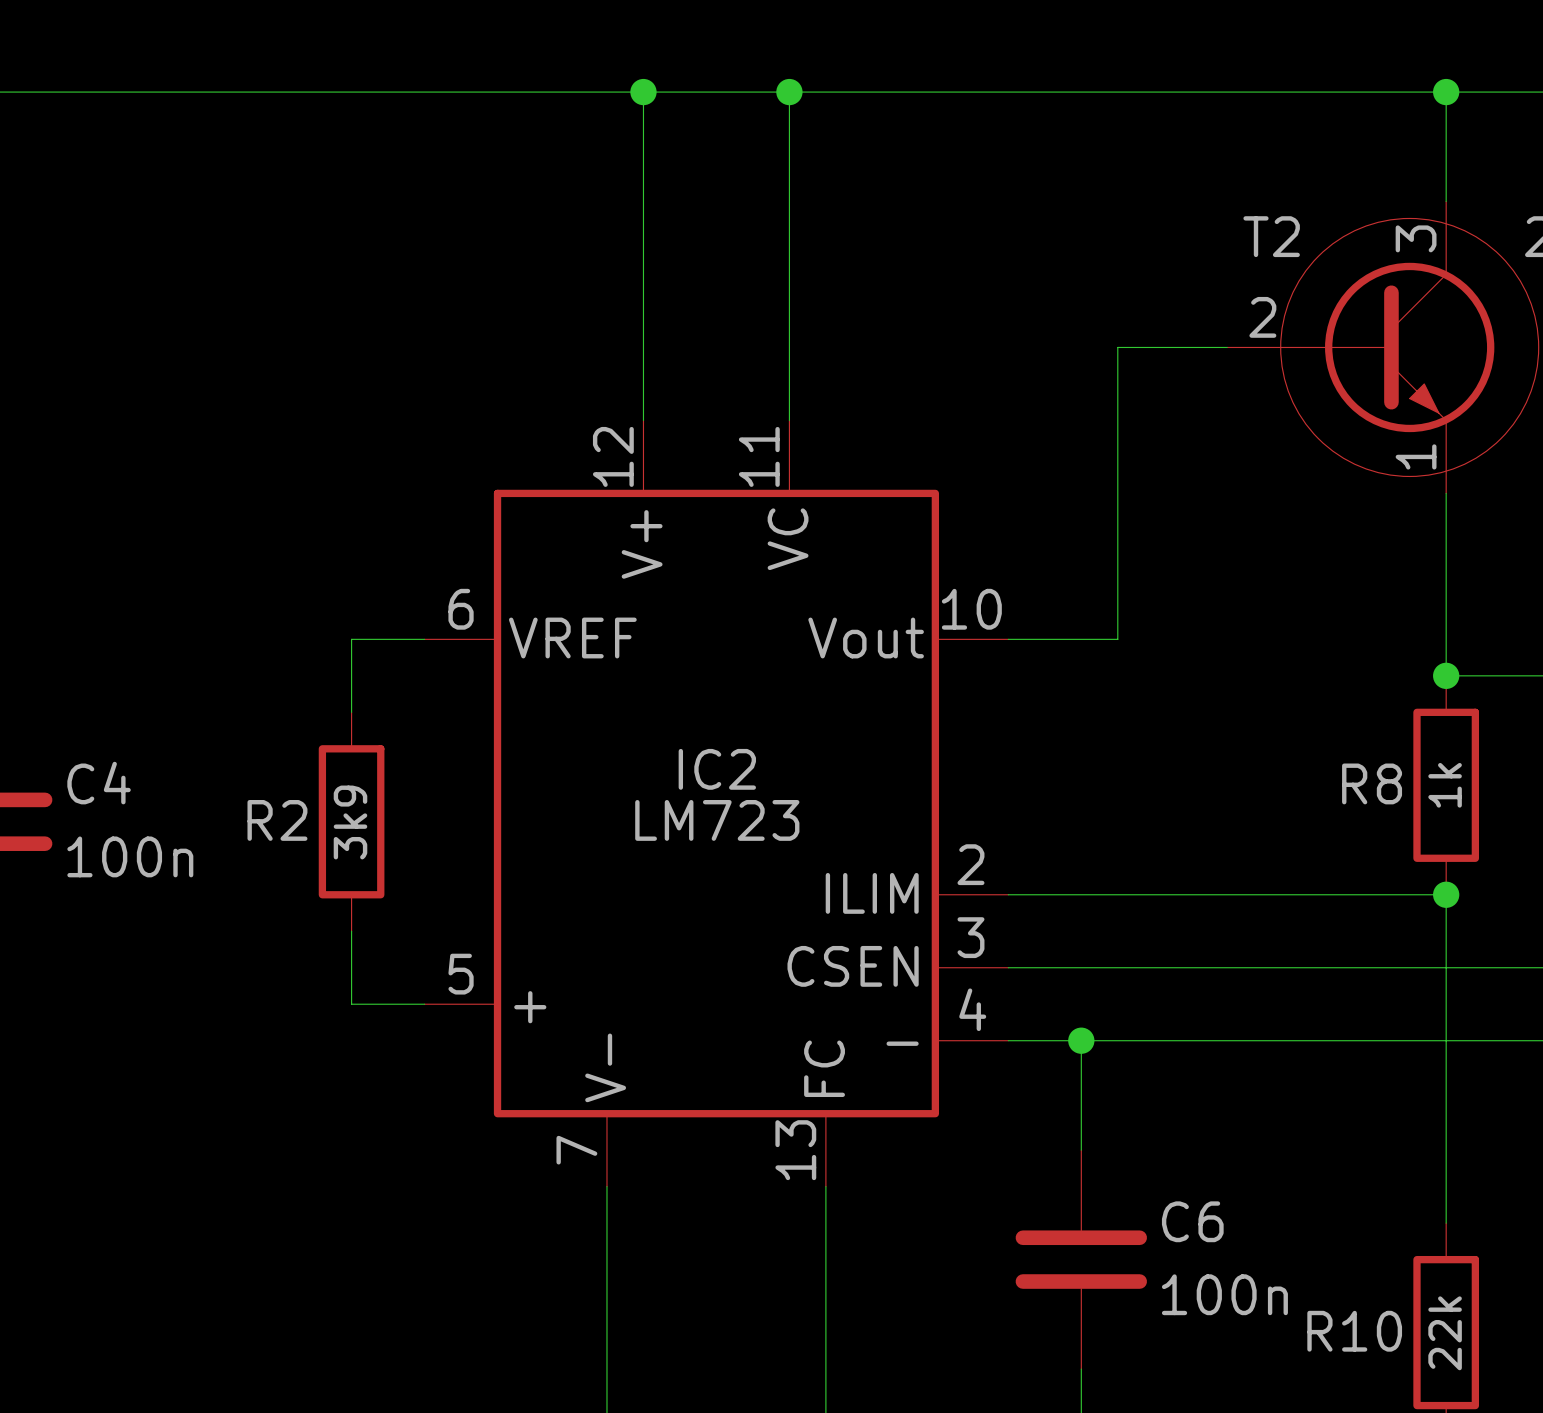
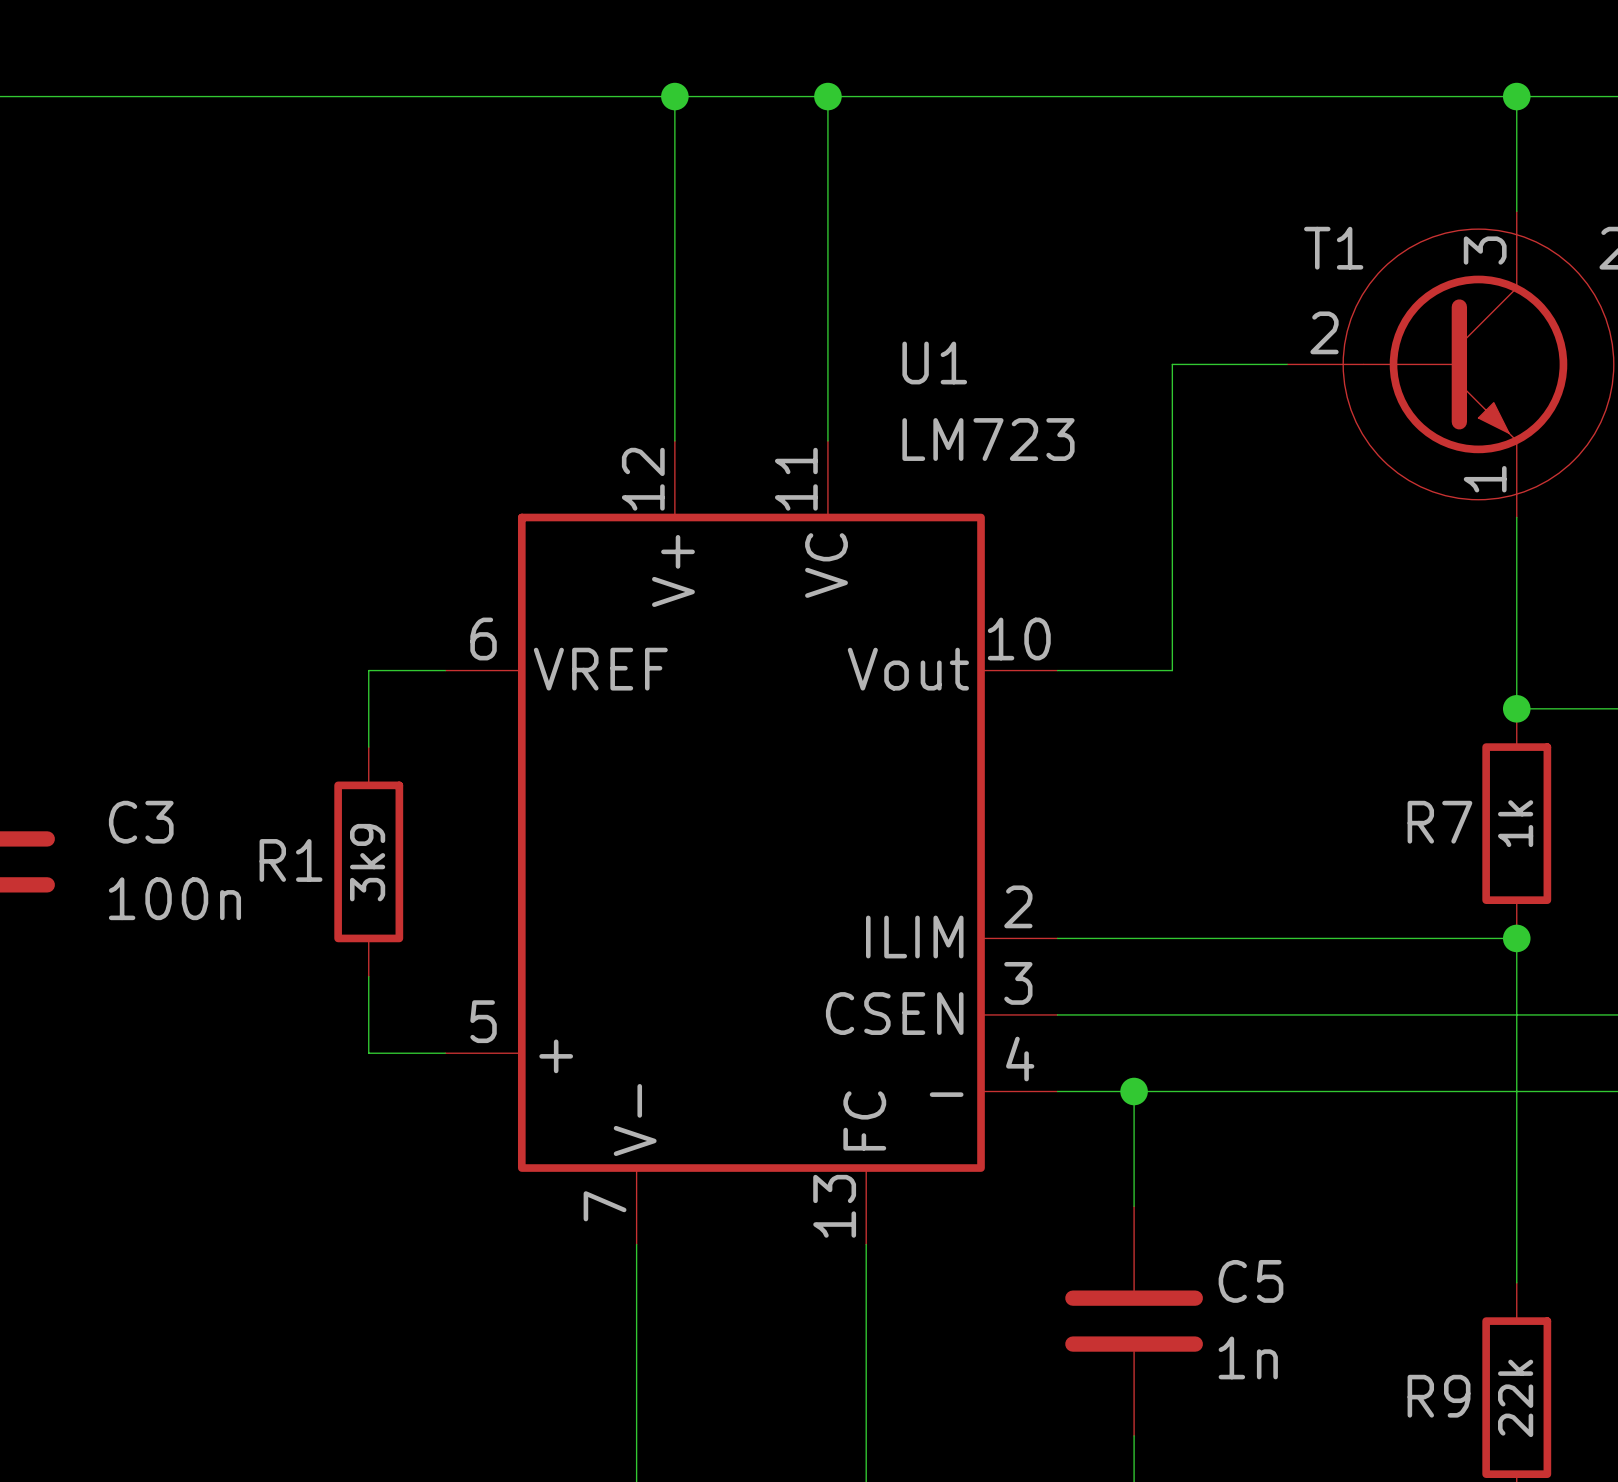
T2 name: T2 (1271, 236) -> T1 (1333, 248)
IC2 name: IC2 (717, 769) -> U1 (934, 362)
C4 name: C4 (99, 783) -> C3 (141, 822)
R8 name: R8 (1372, 783) -> R7 (1439, 822)
R2 name: R2 (277, 820) -> R1 (291, 860)
IC2 value position: LM723 (717, 820) -> LM723 (988, 439)
C4 value position: 100n (130, 856) -> 100n (174, 898)
C6 name: C6 (1192, 1221) -> C5 (1250, 1281)
C6 value: 100n (1224, 1294) -> 1n (1248, 1357)
R10 name: R10 (1354, 1331) -> R9 (1439, 1396)

